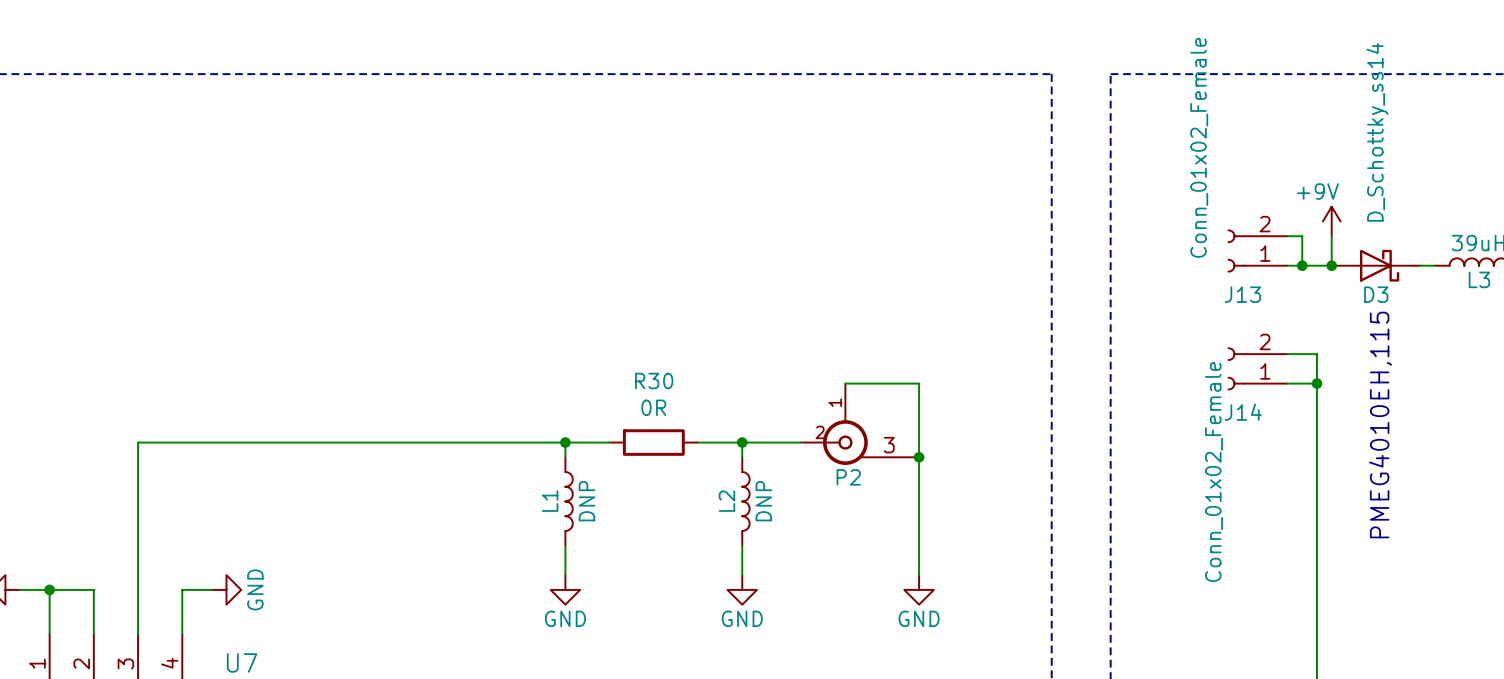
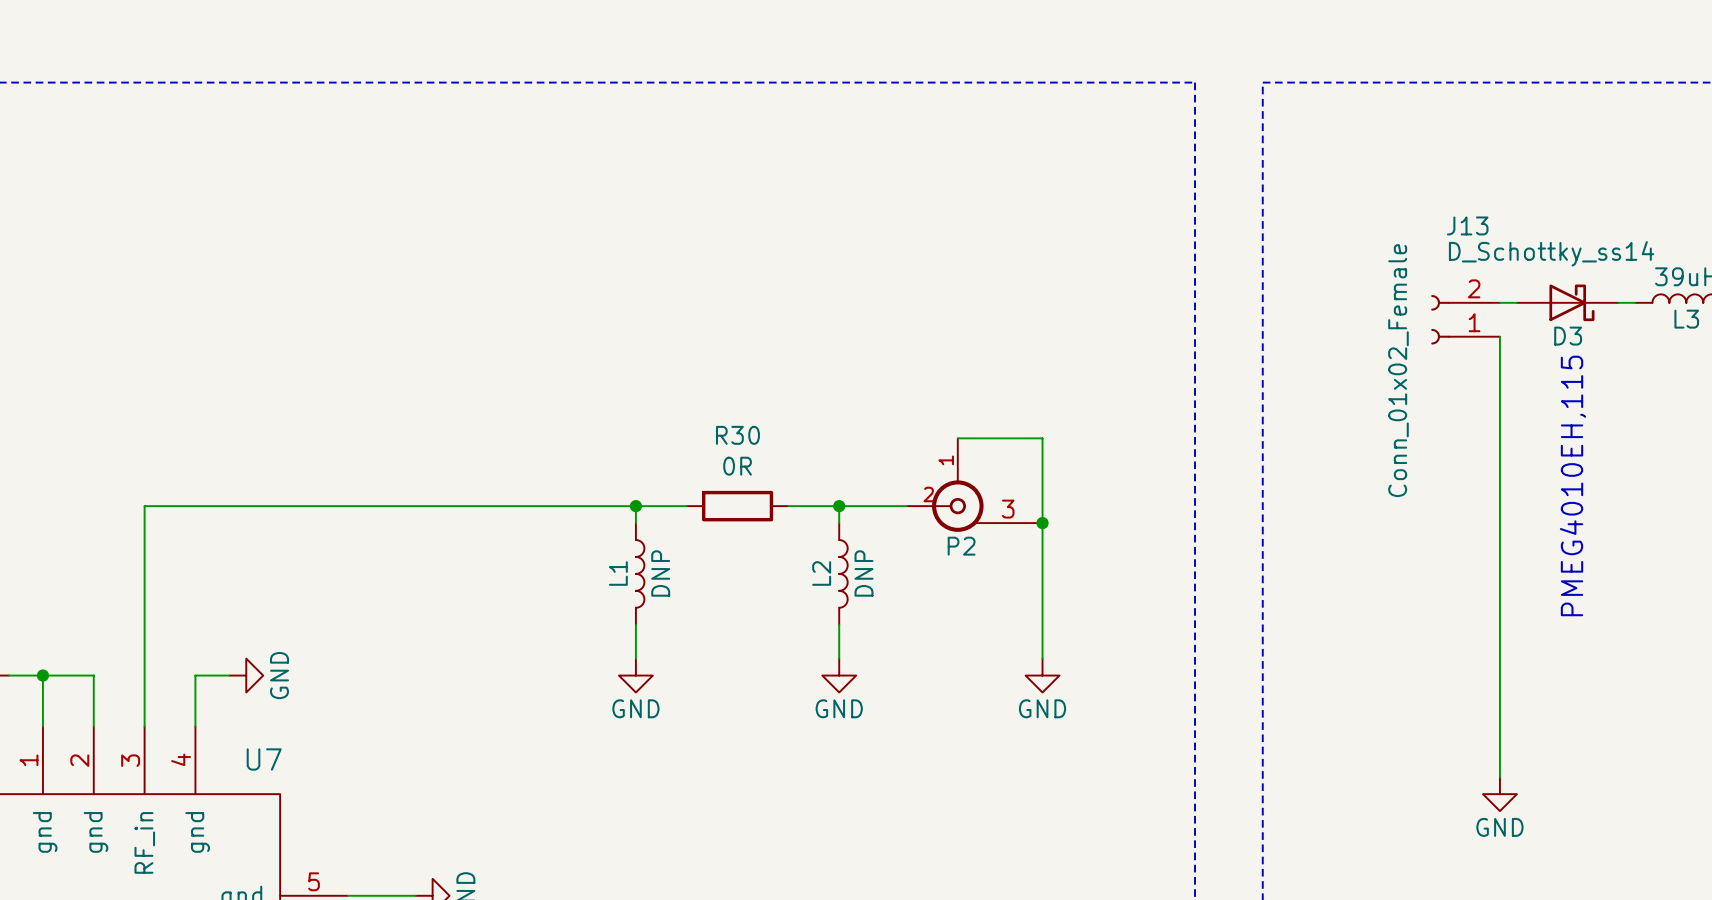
D3 value rotation: 0° (1377, 132) -> 90° clockwise (1551, 253)
J13 value position: Conn_01x02_Female (1199, 147) -> Conn_01x02_Female (1398, 370)
power symbol: +9V (1331, 221) -> none
wire: (1287, 236) (1302, 236) (1302, 265) -> none
wire: (1331, 236) (1331, 265) -> none
J13 position: (1257, 250) -> (1465, 319)
junction: (1302, 265) -> none
junction: (1331, 265) -> none
J13 name position: J13 (1242, 294) -> J13 (1467, 225)
wire: (1287, 354) (1316, 354) -> (1499, 336) (1499, 404)
J14: Conn_01x02_Female (1257, 368) -> none
wire: (1287, 383) (1316, 383) -> none
junction: (1316, 383) -> none

